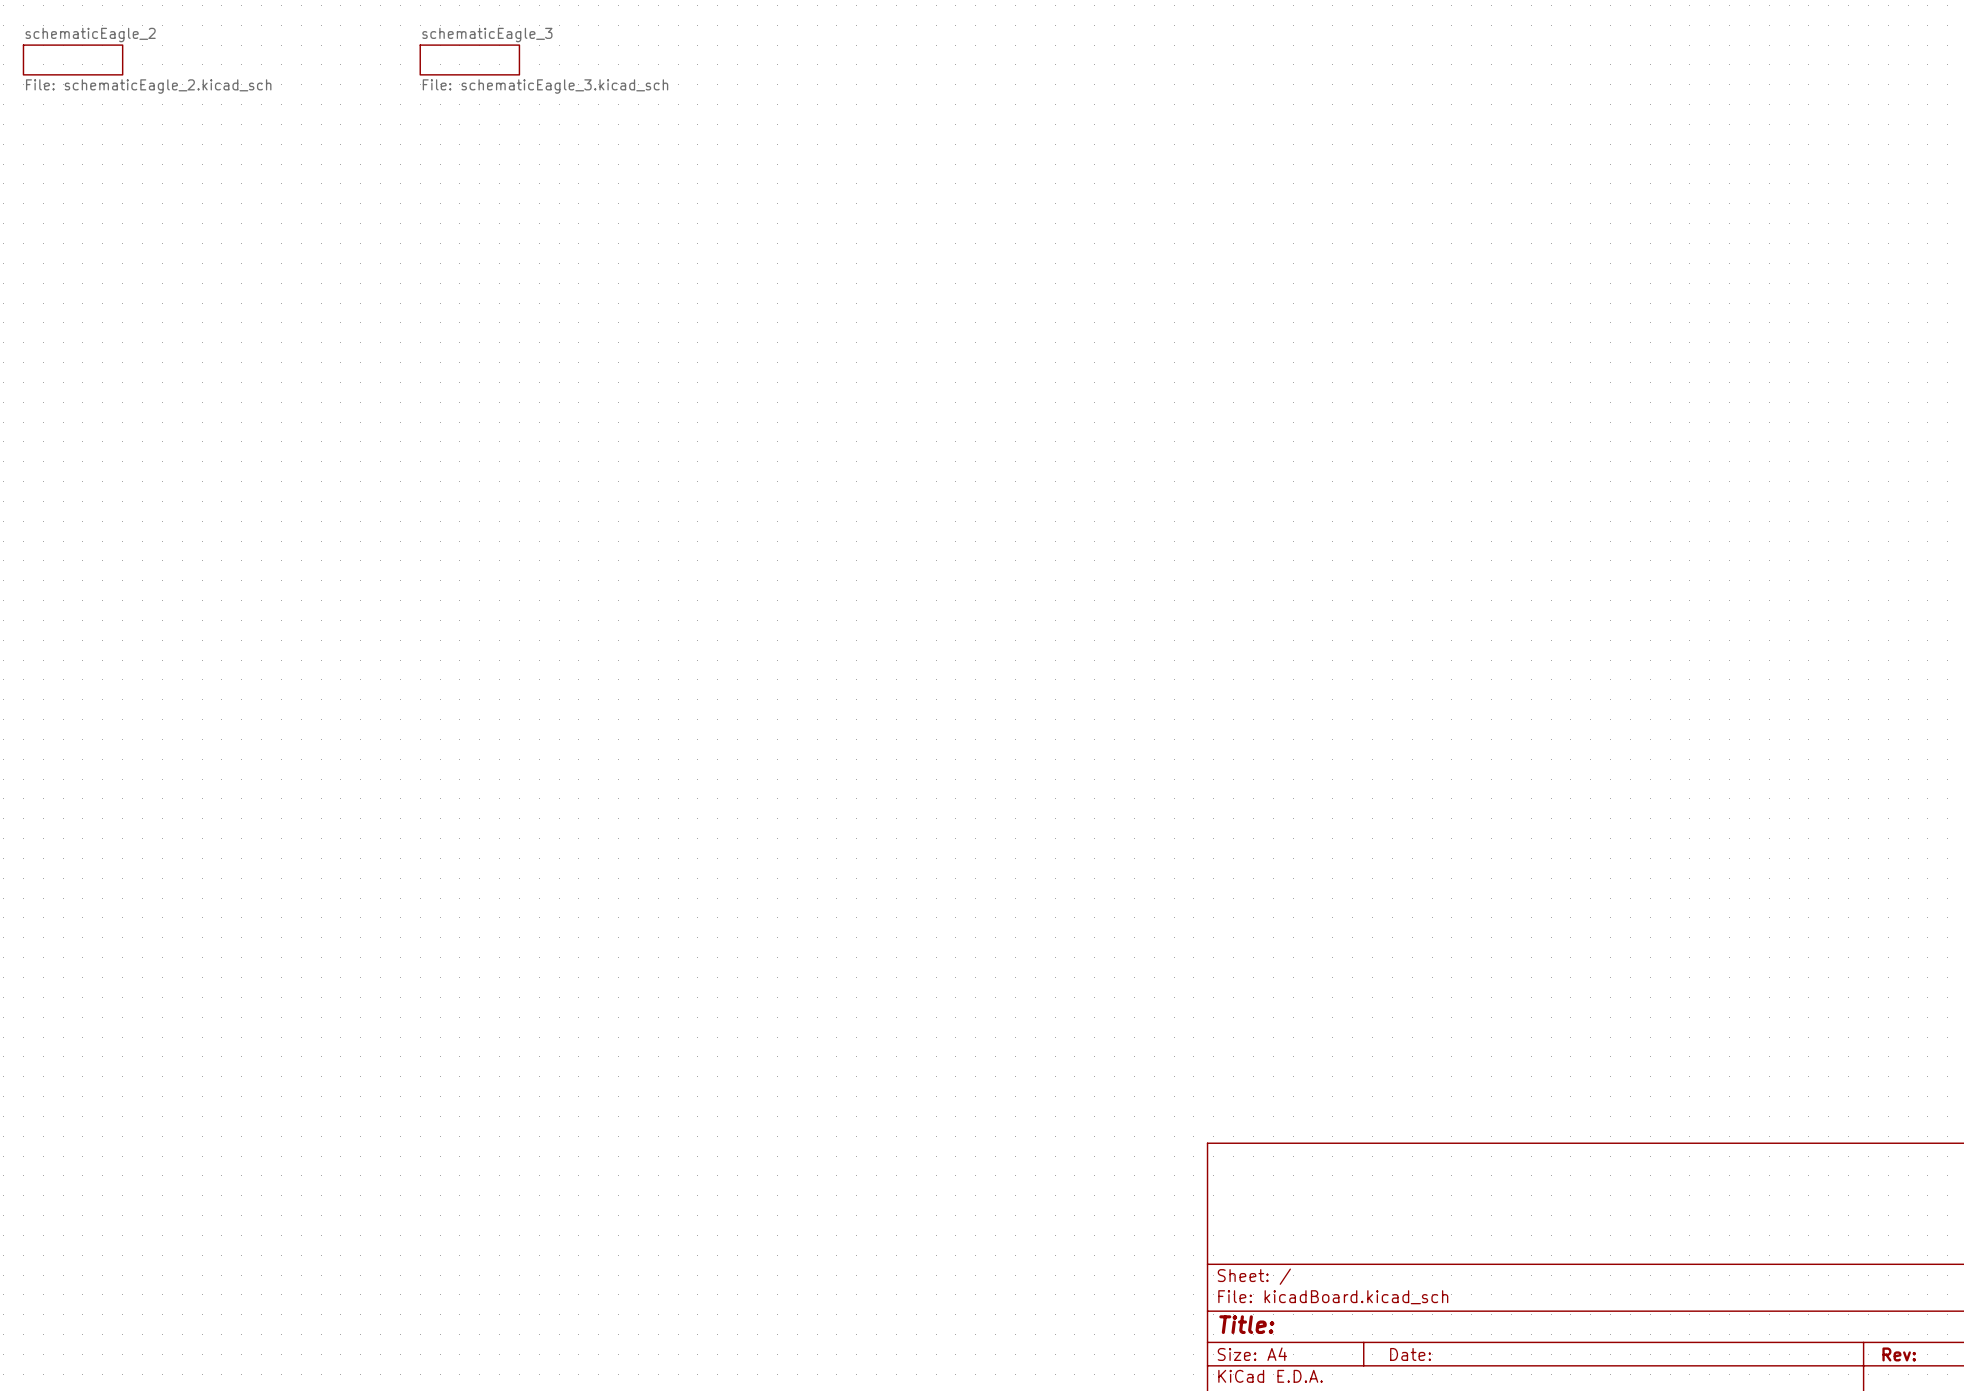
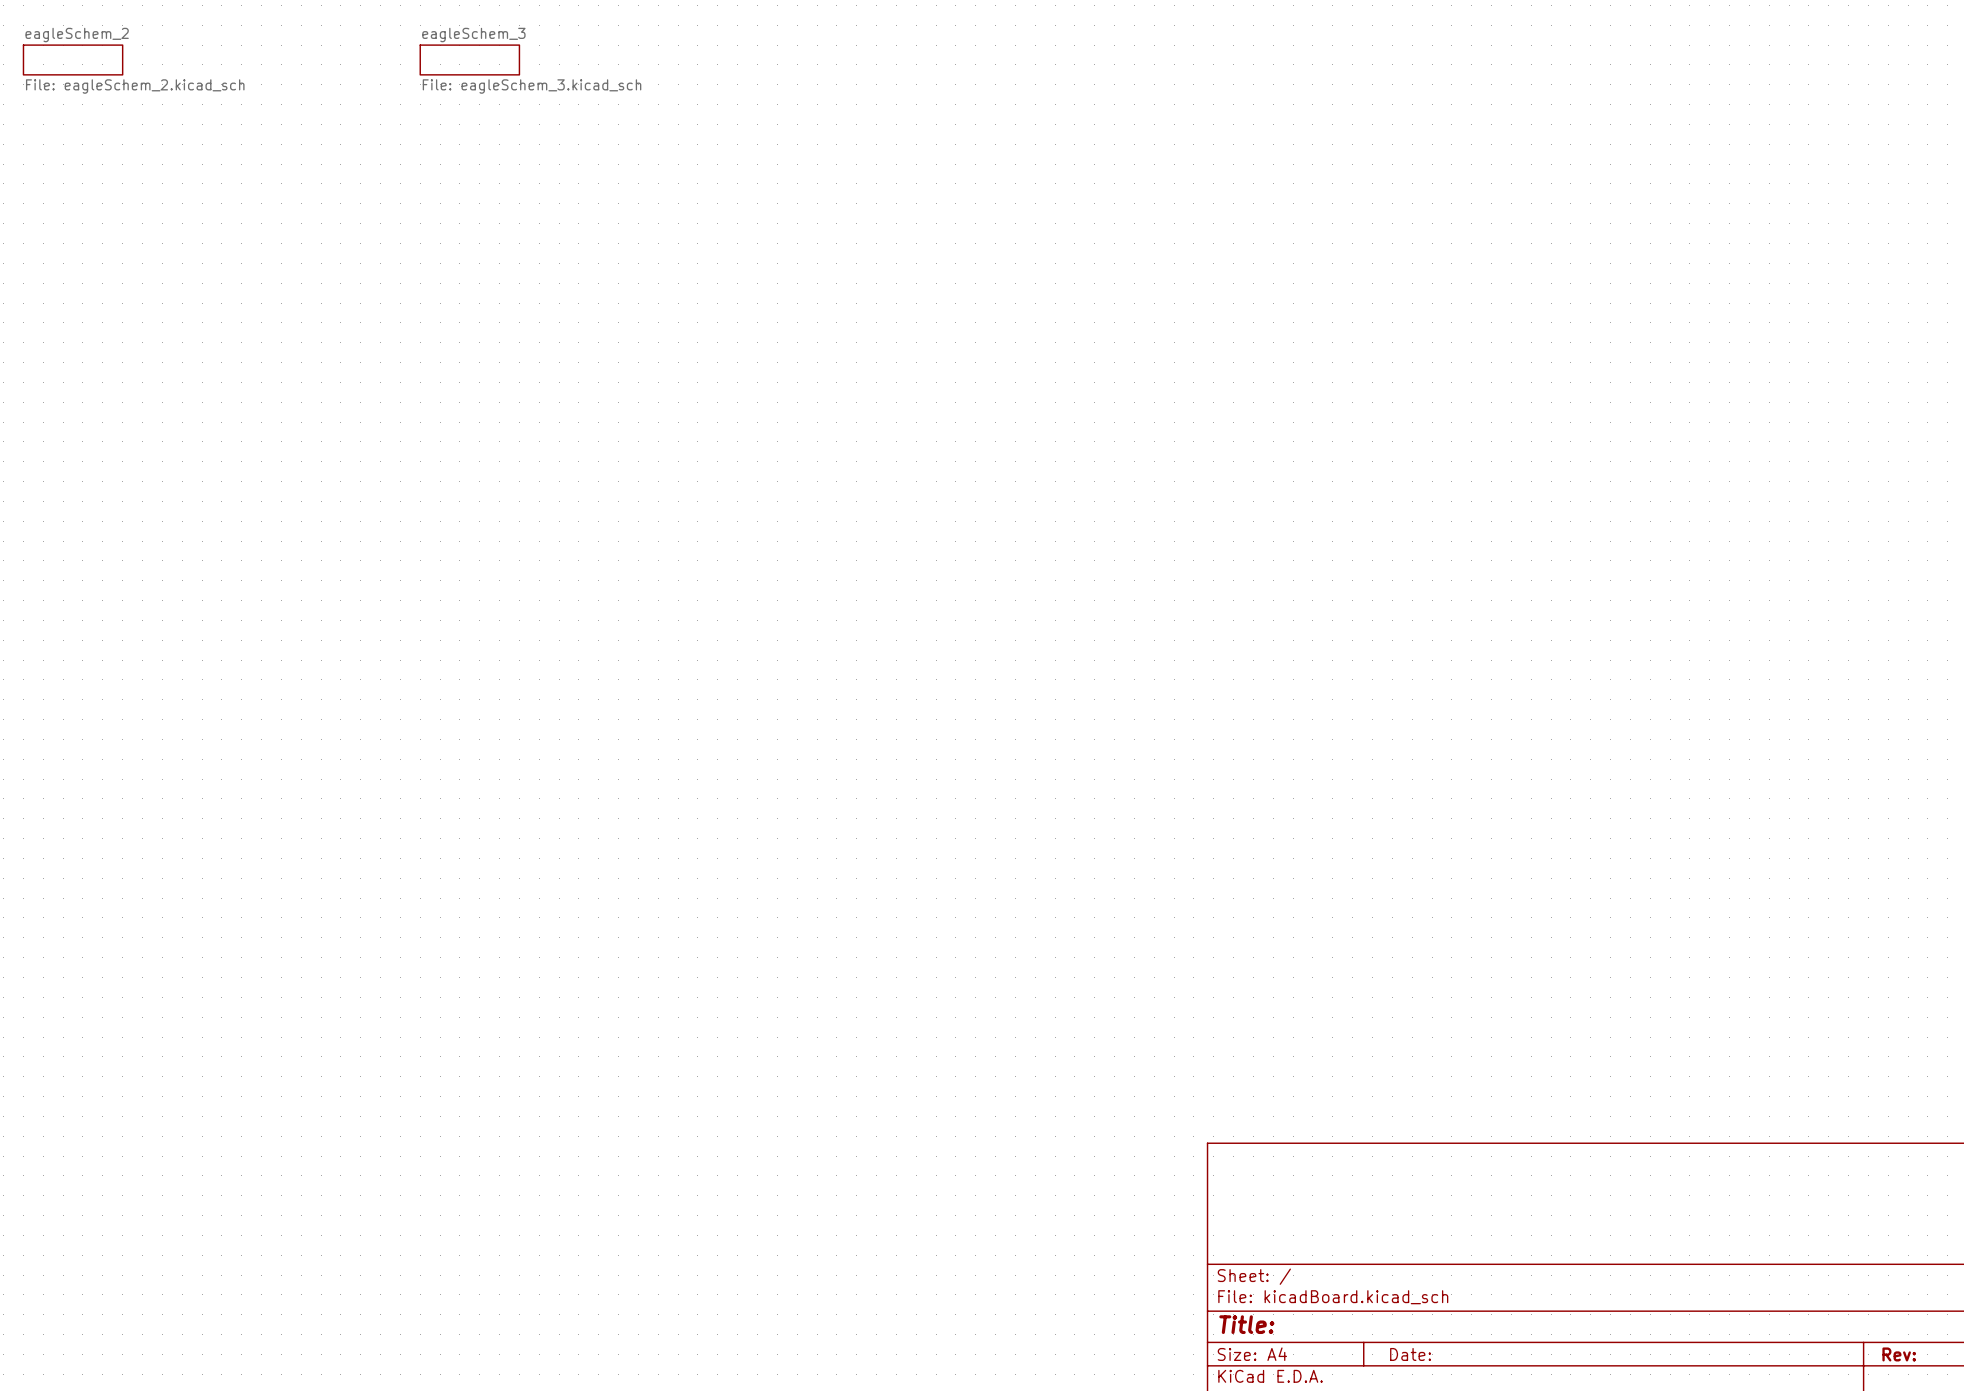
sheet schematicEagle_2 name: schematicEagle_2 (90, 35) -> eagleSchem_2 (77, 35)
sheet schematicEagle_3 name: schematicEagle_3 (487, 35) -> eagleSchem_3 (473, 35)
sheet schematicEagle_2 value: File: schematicEagle_2.kicad_sch (148, 86) -> File: eagleSchem_2.kicad_sch (135, 86)
sheet schematicEagle_3 value: File: schematicEagle_3.kicad_sch (545, 86) -> File: eagleSchem_3.kicad_sch (532, 86)

